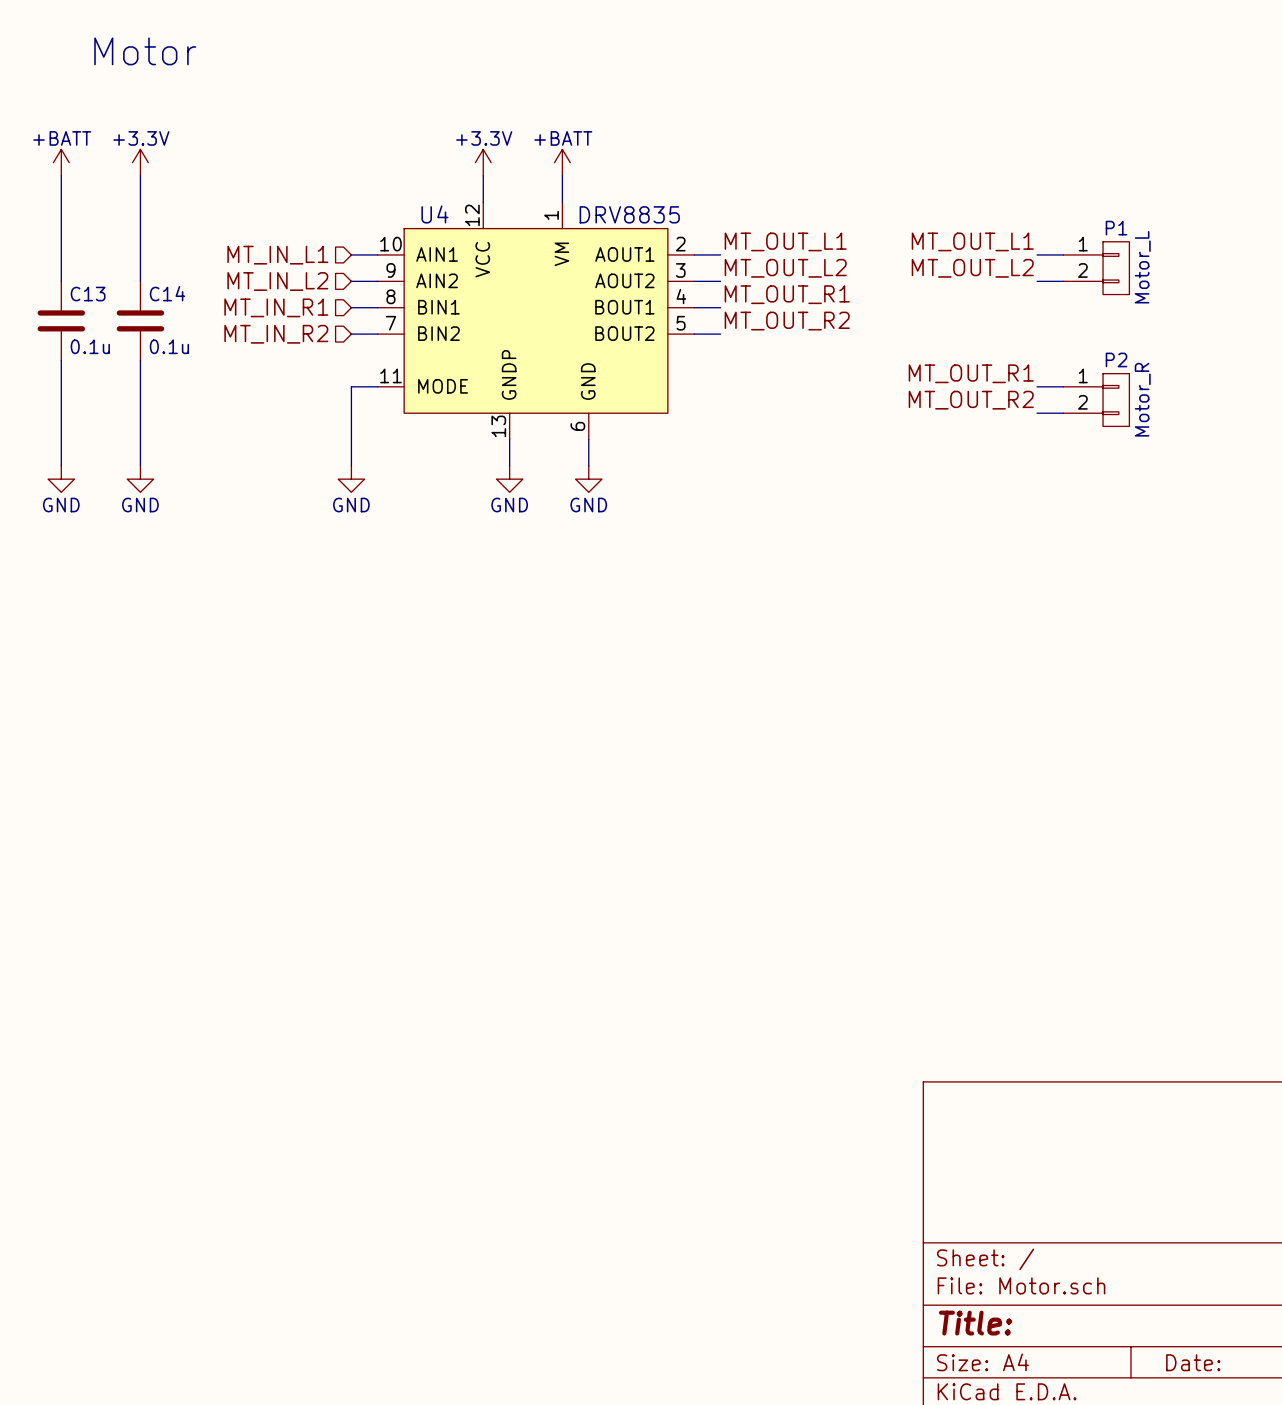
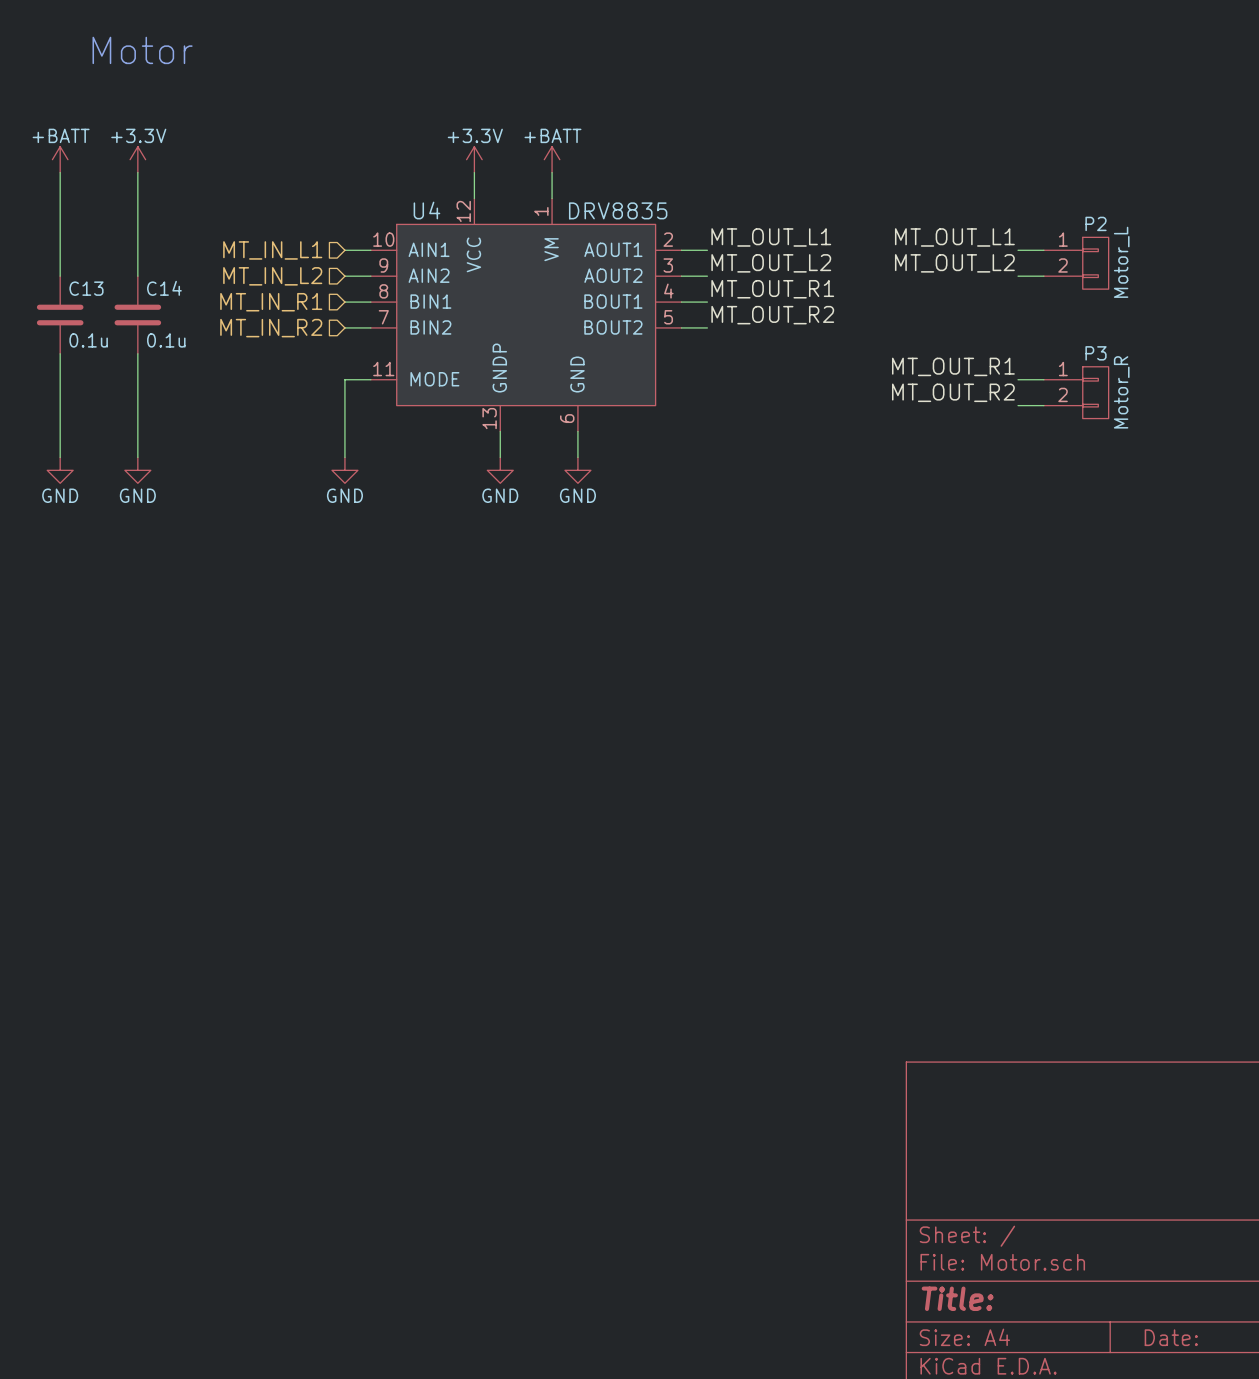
P1 name: P1 (1116, 228) -> P2 (1096, 223)
P2 name: P2 (1116, 359) -> P3 (1096, 353)

